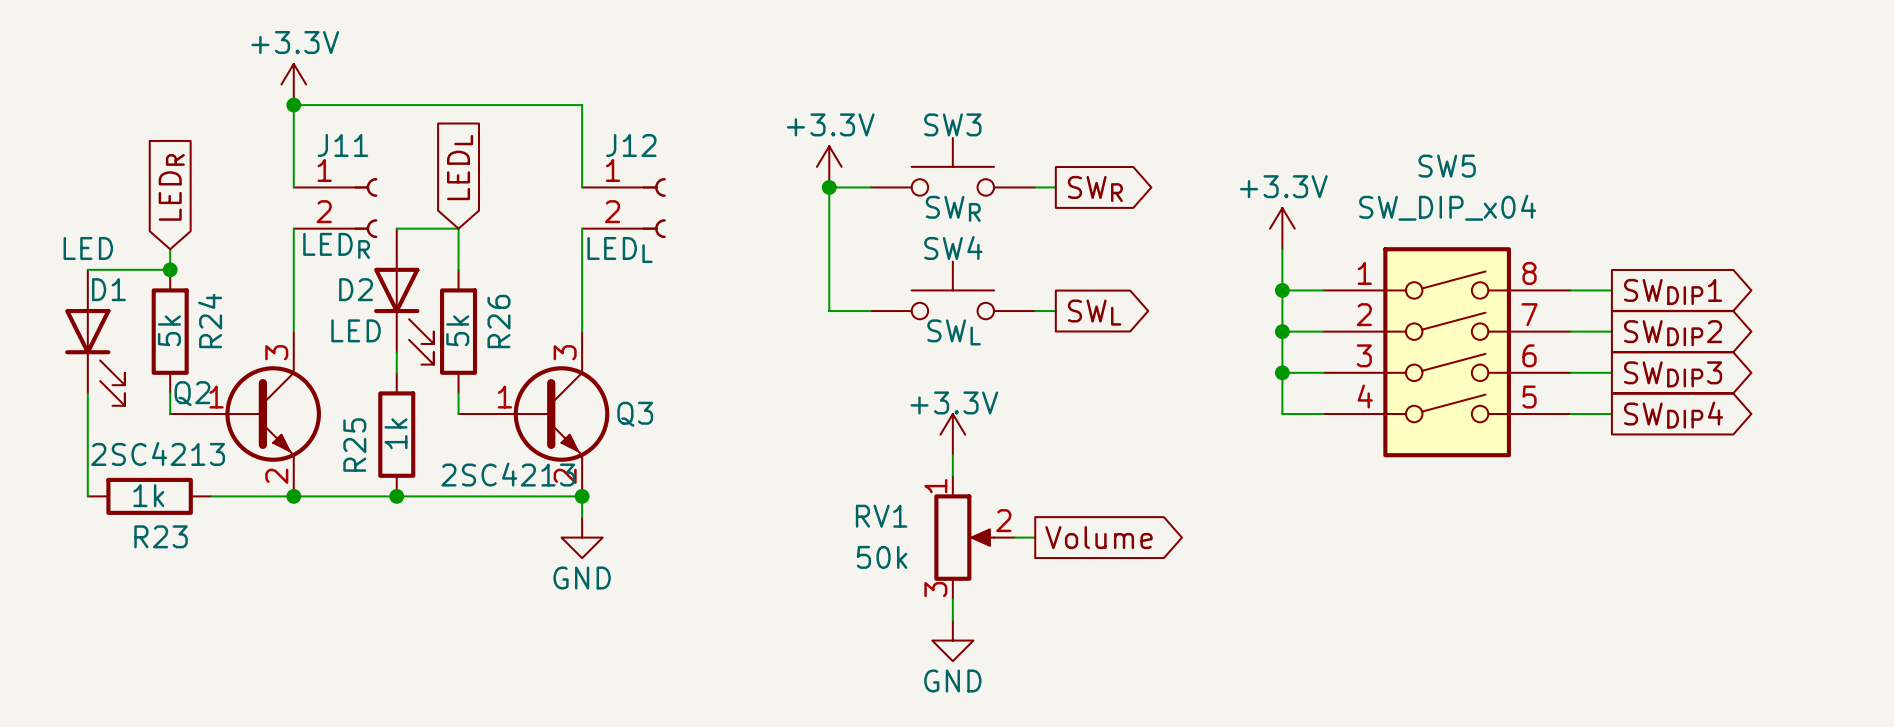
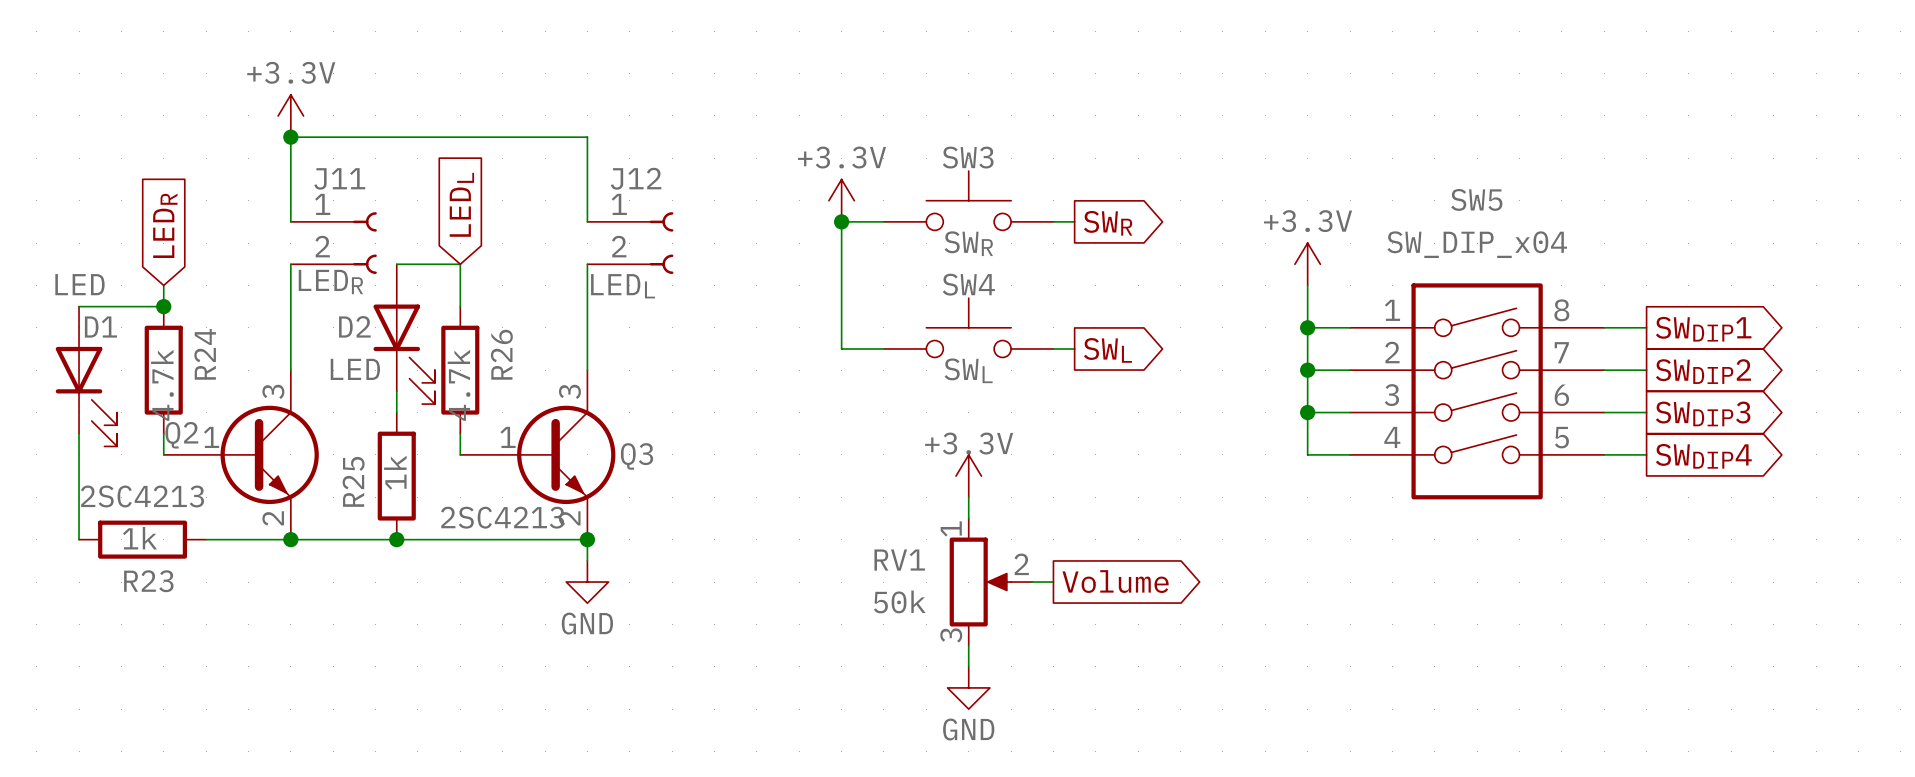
R24 value: 5k (169, 330) -> 4.7k (162, 385)
R26 value: 5k (457, 330) -> 4.7k (459, 385)

